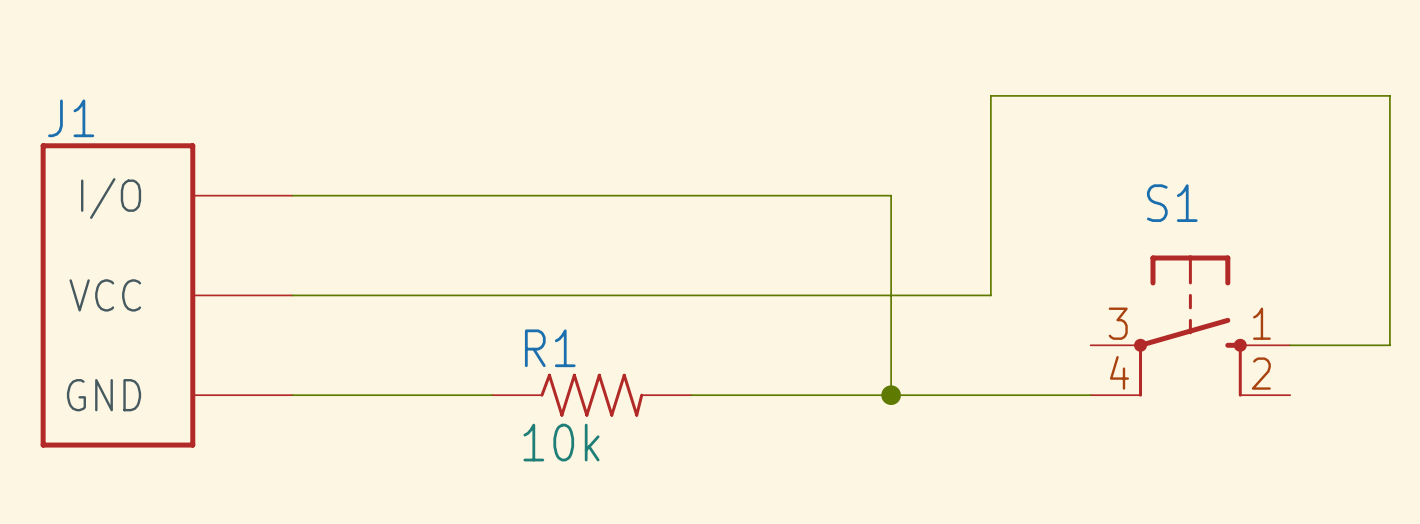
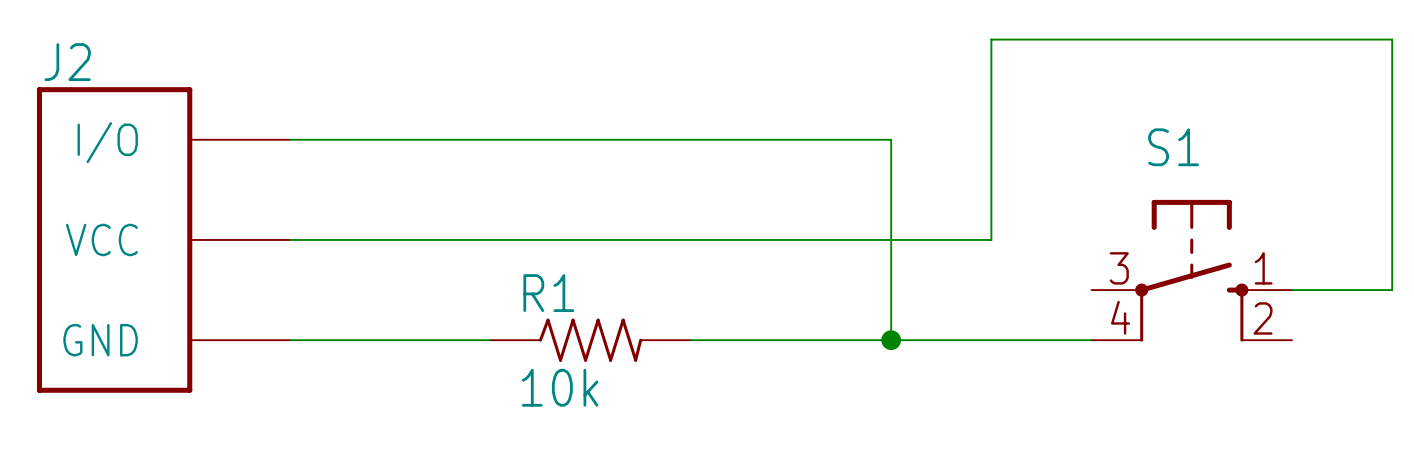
J1 name: J1 (71, 118) -> J2 (67, 62)

